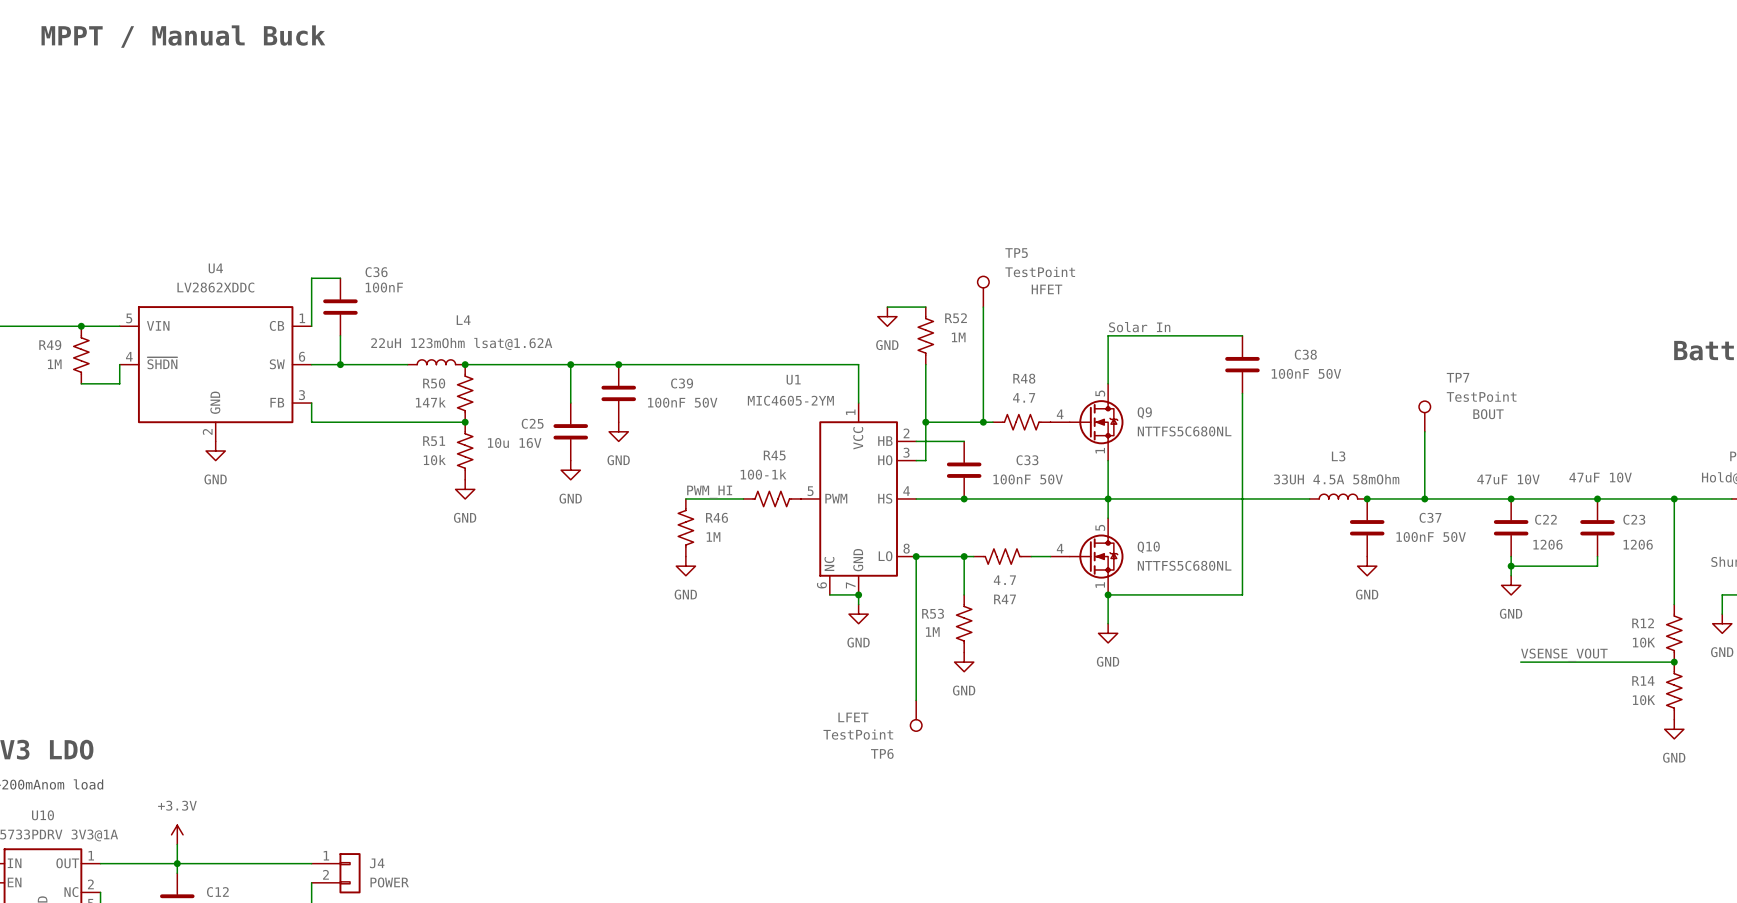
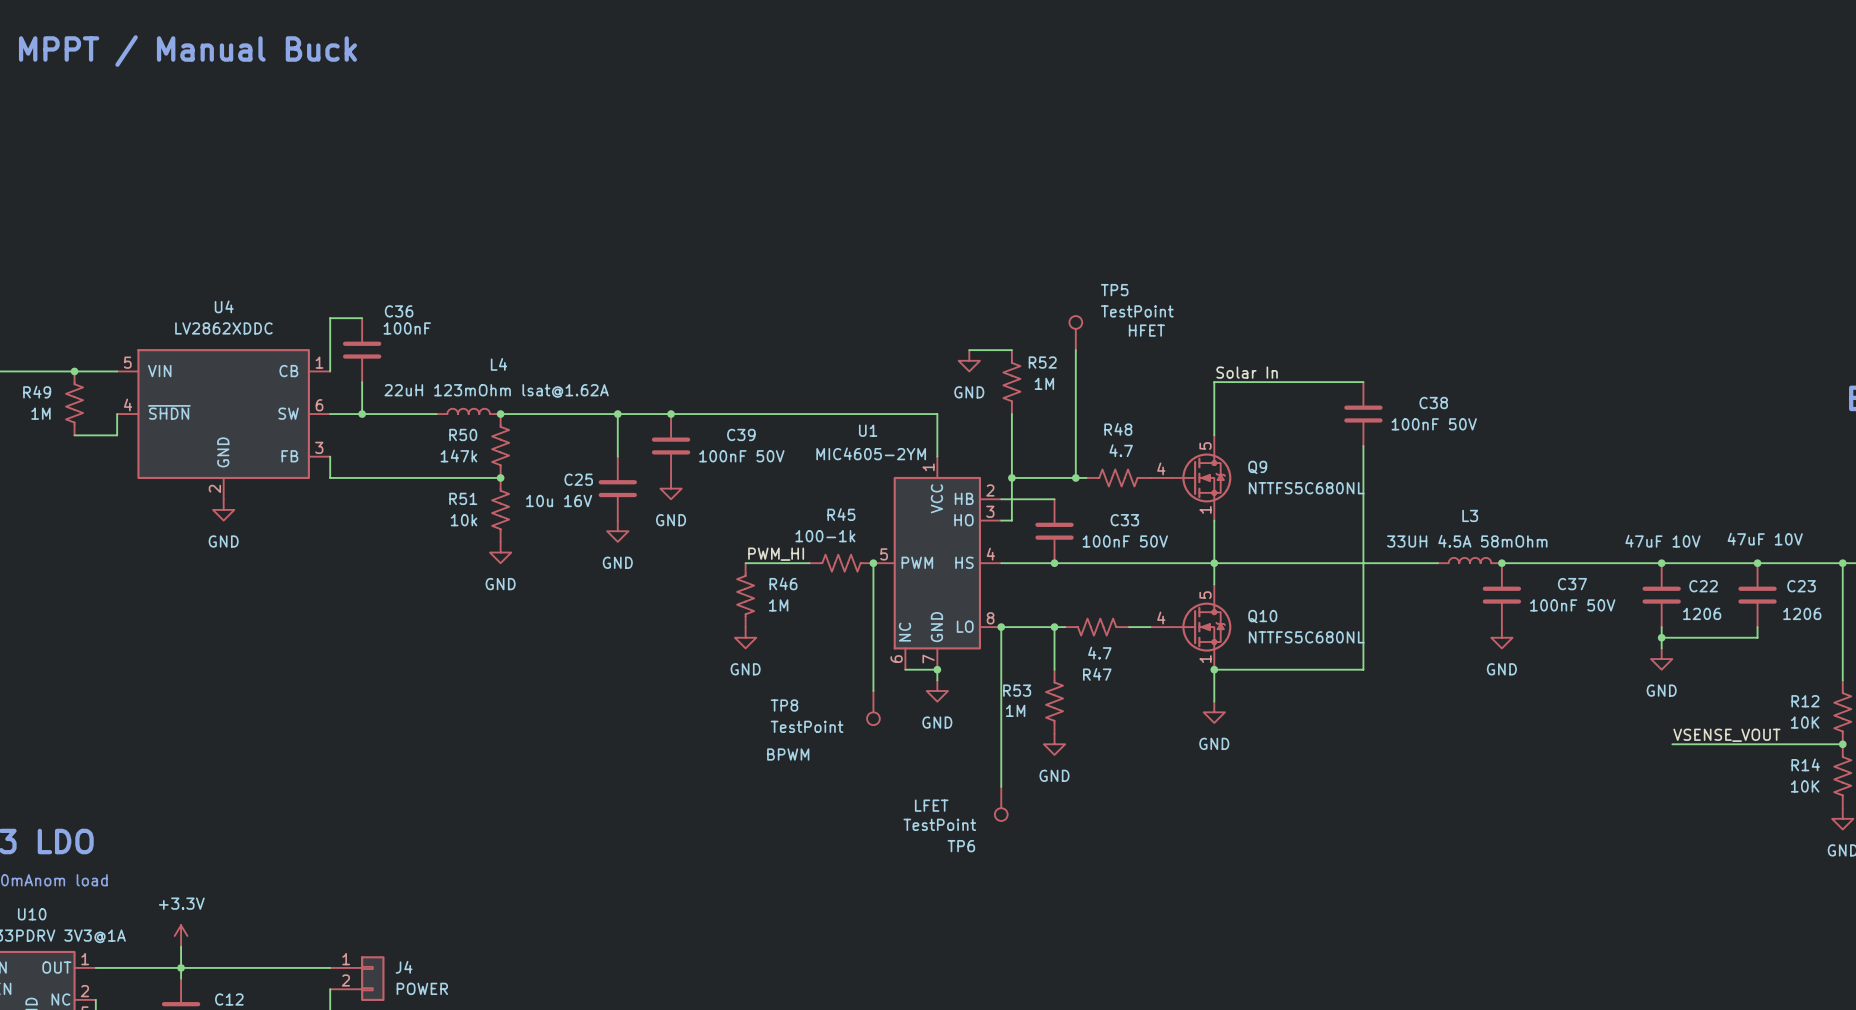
TP7: TestPoint (1424, 416) -> none
wire: (1424, 431) (1424, 498) -> none
wire: none -> (873, 563) (873, 691)
junction: none -> (873, 563)
junction: (1424, 498) -> none
TP8: none -> TestPoint (873, 708)

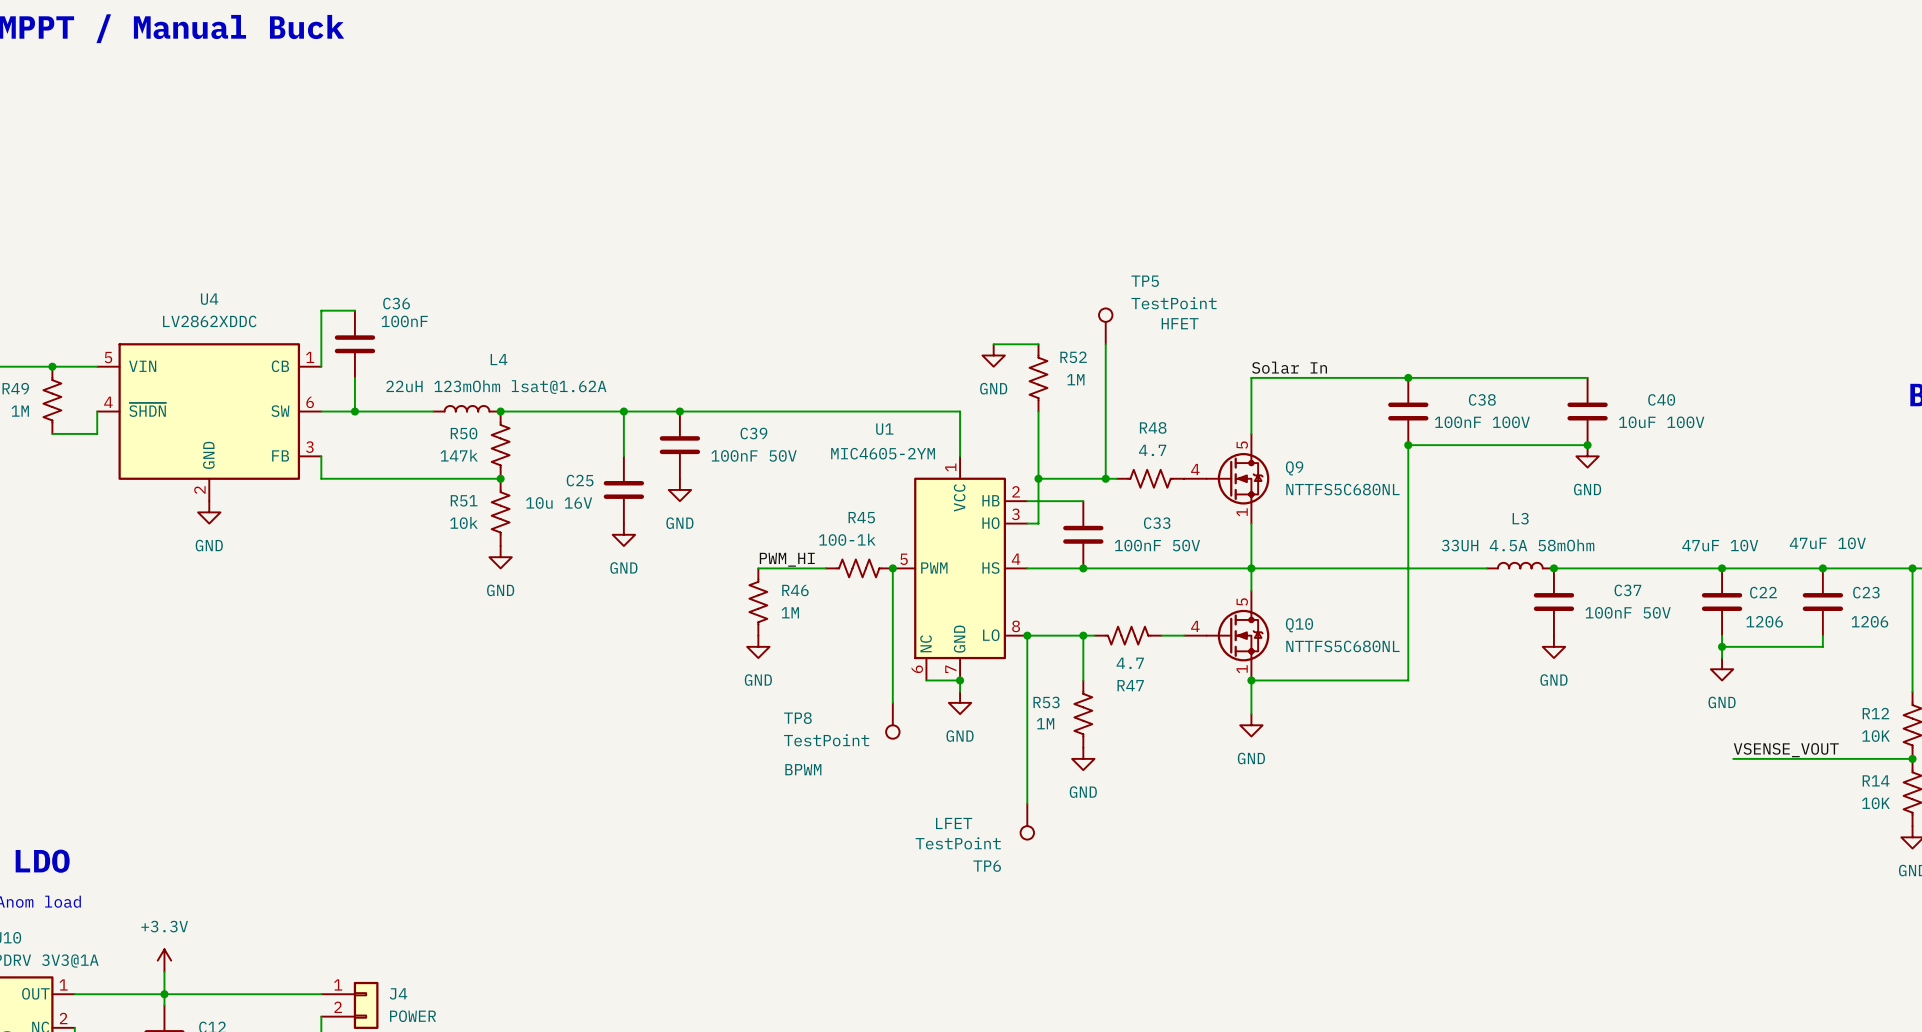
wire: none -> (1408, 377) (1587, 377)
junction: none -> (1408, 377)
C40: none -> 10uF 100V (1587, 411)
C38 value: 100nF 50V (1434, 424) -> 100nF 100V (1482, 422)
wire: none -> (1408, 445) (1587, 445)
junction: none -> (1408, 445)
junction: none -> (1587, 445)
power symbol: none -> GND (1587, 456)

